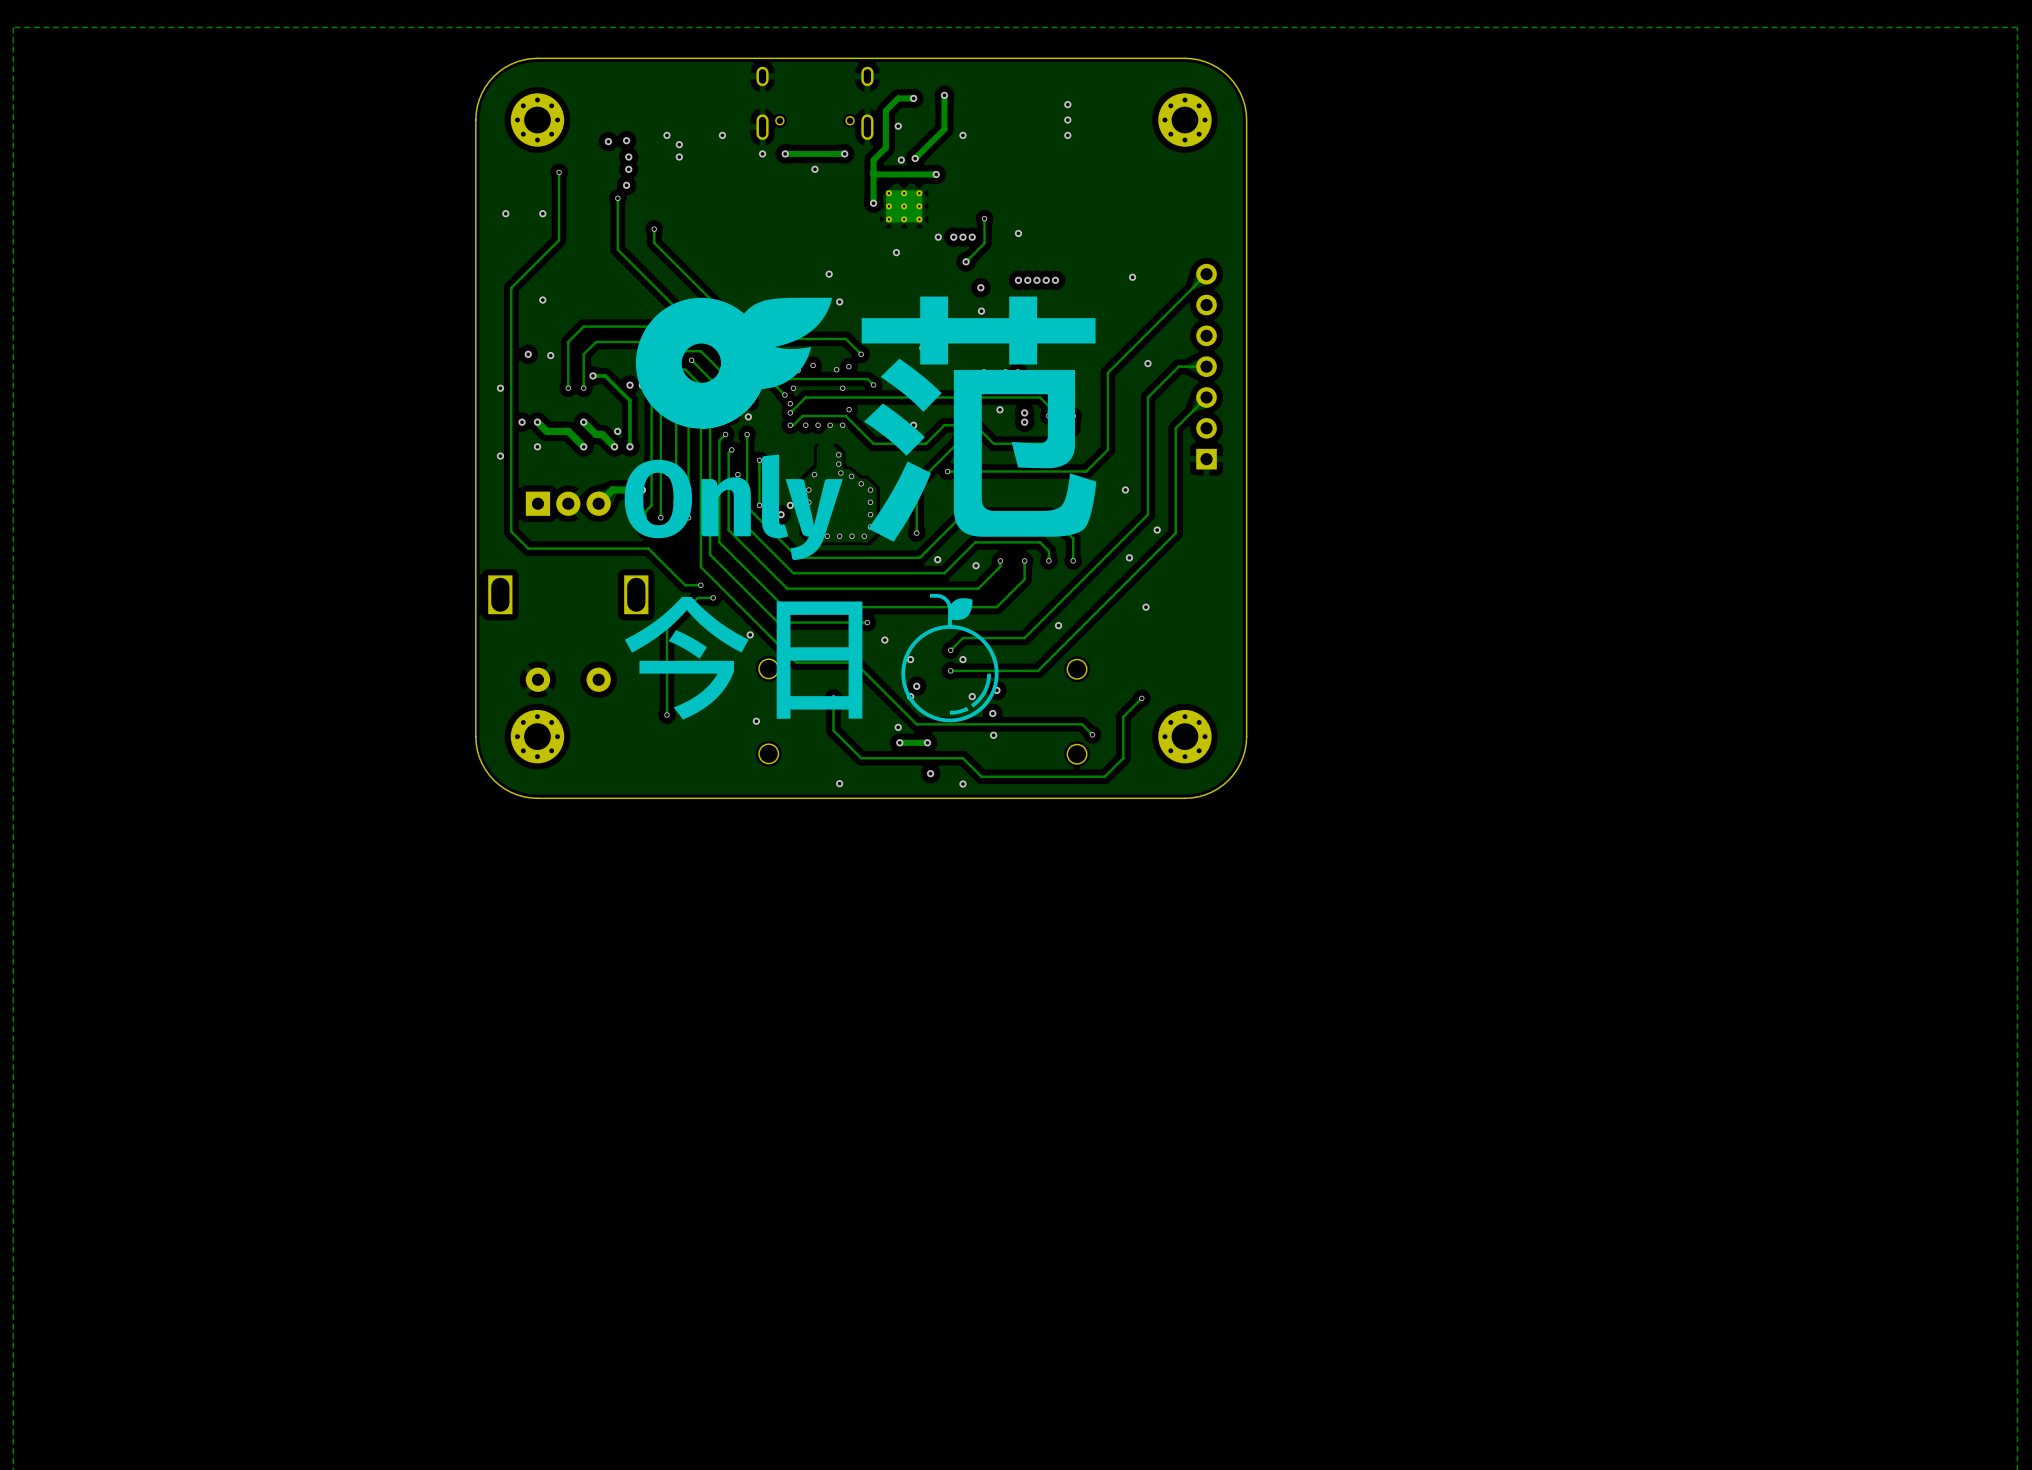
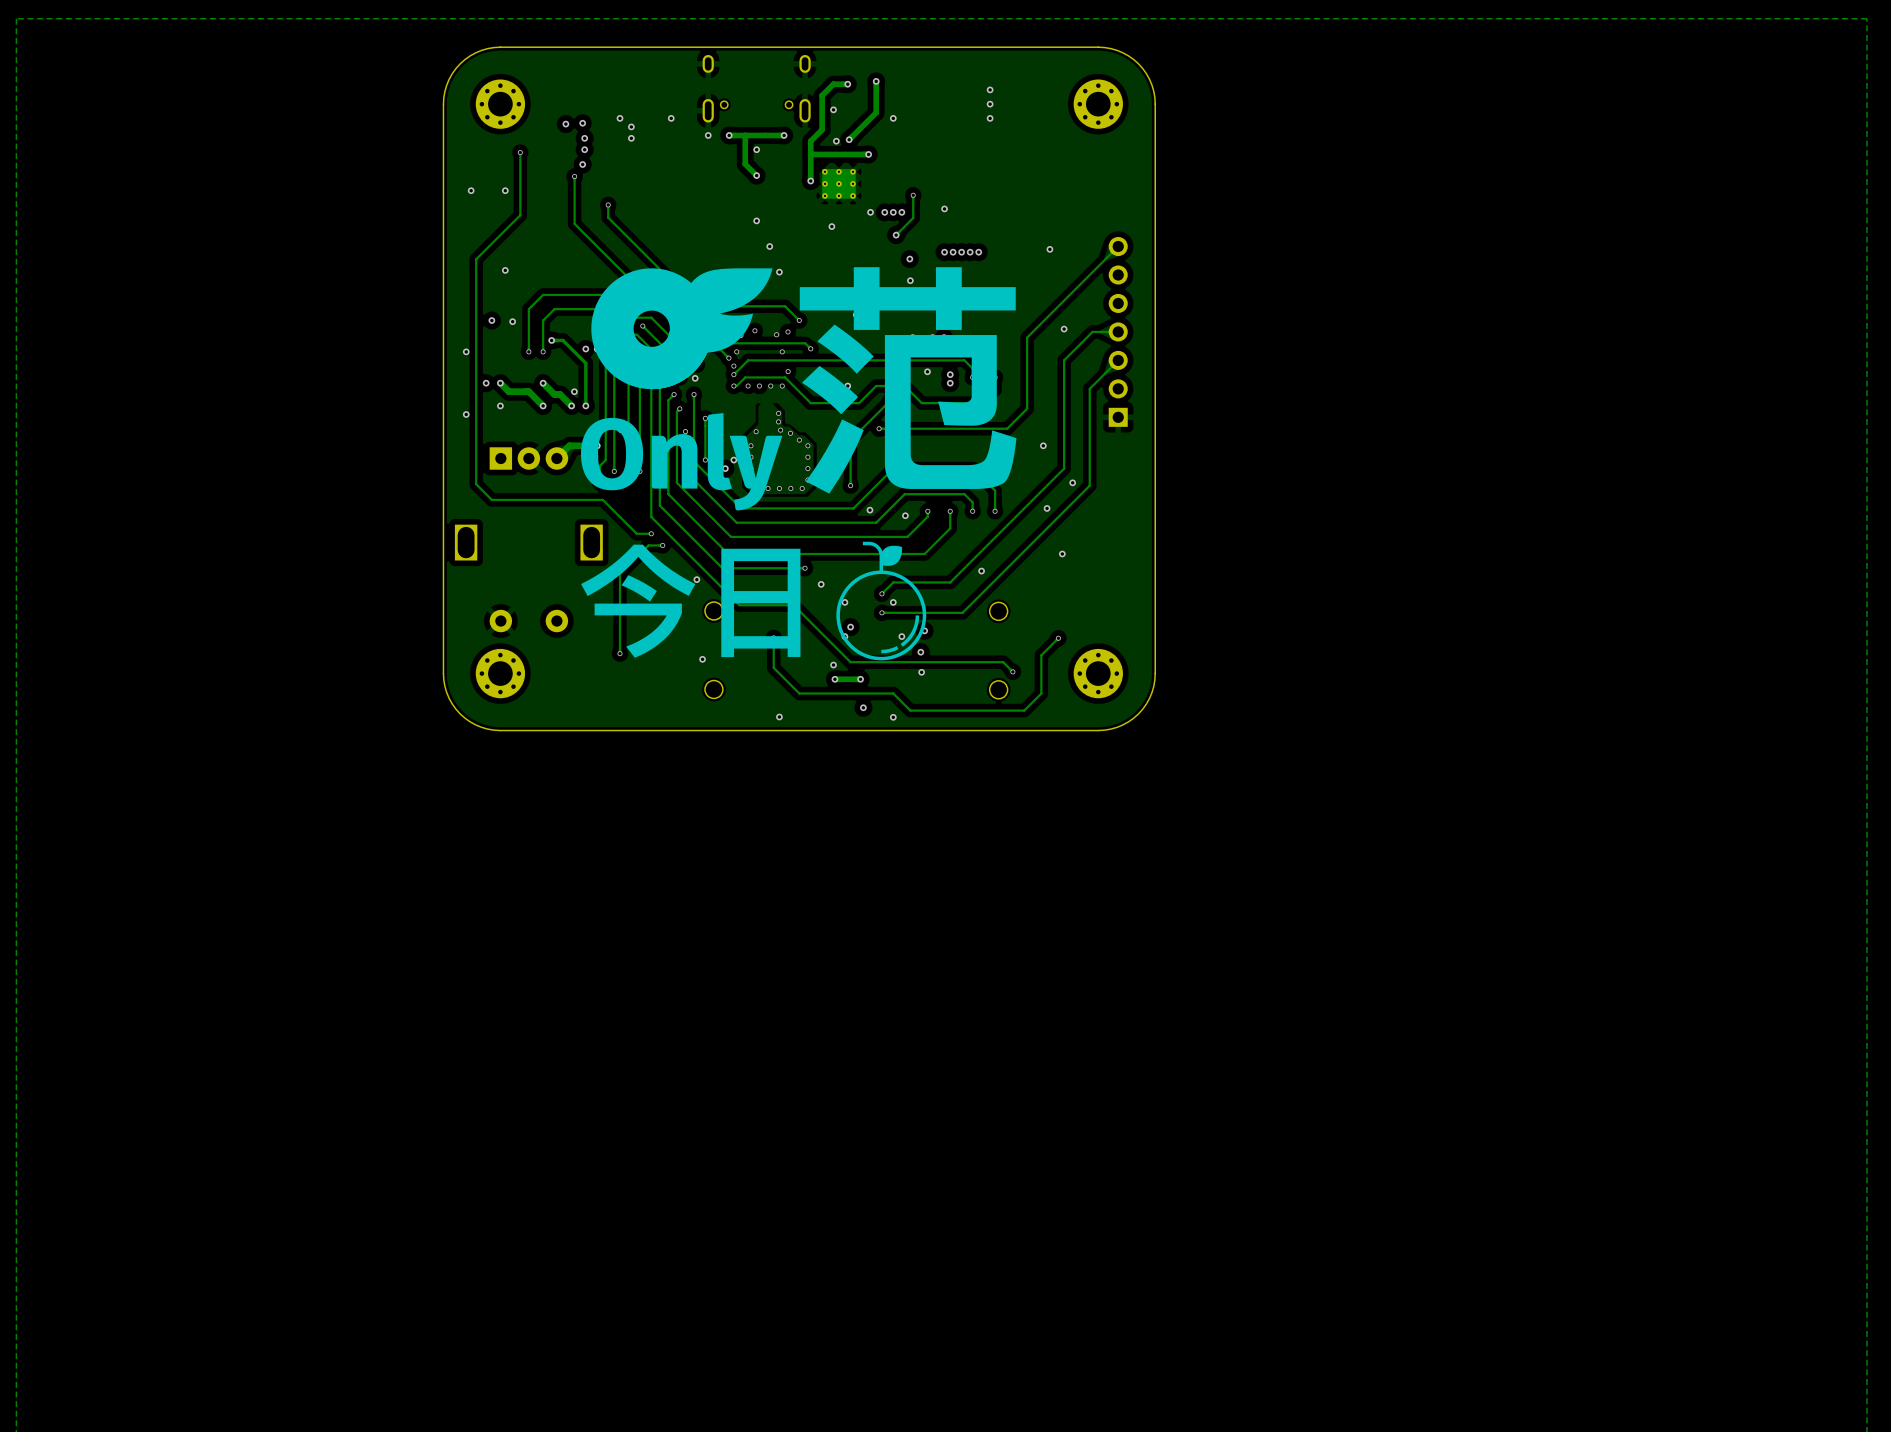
track: none -> (745, 135) (745, 164) (756, 175)
via: none -> (756, 175)
via: none -> (756, 220)

